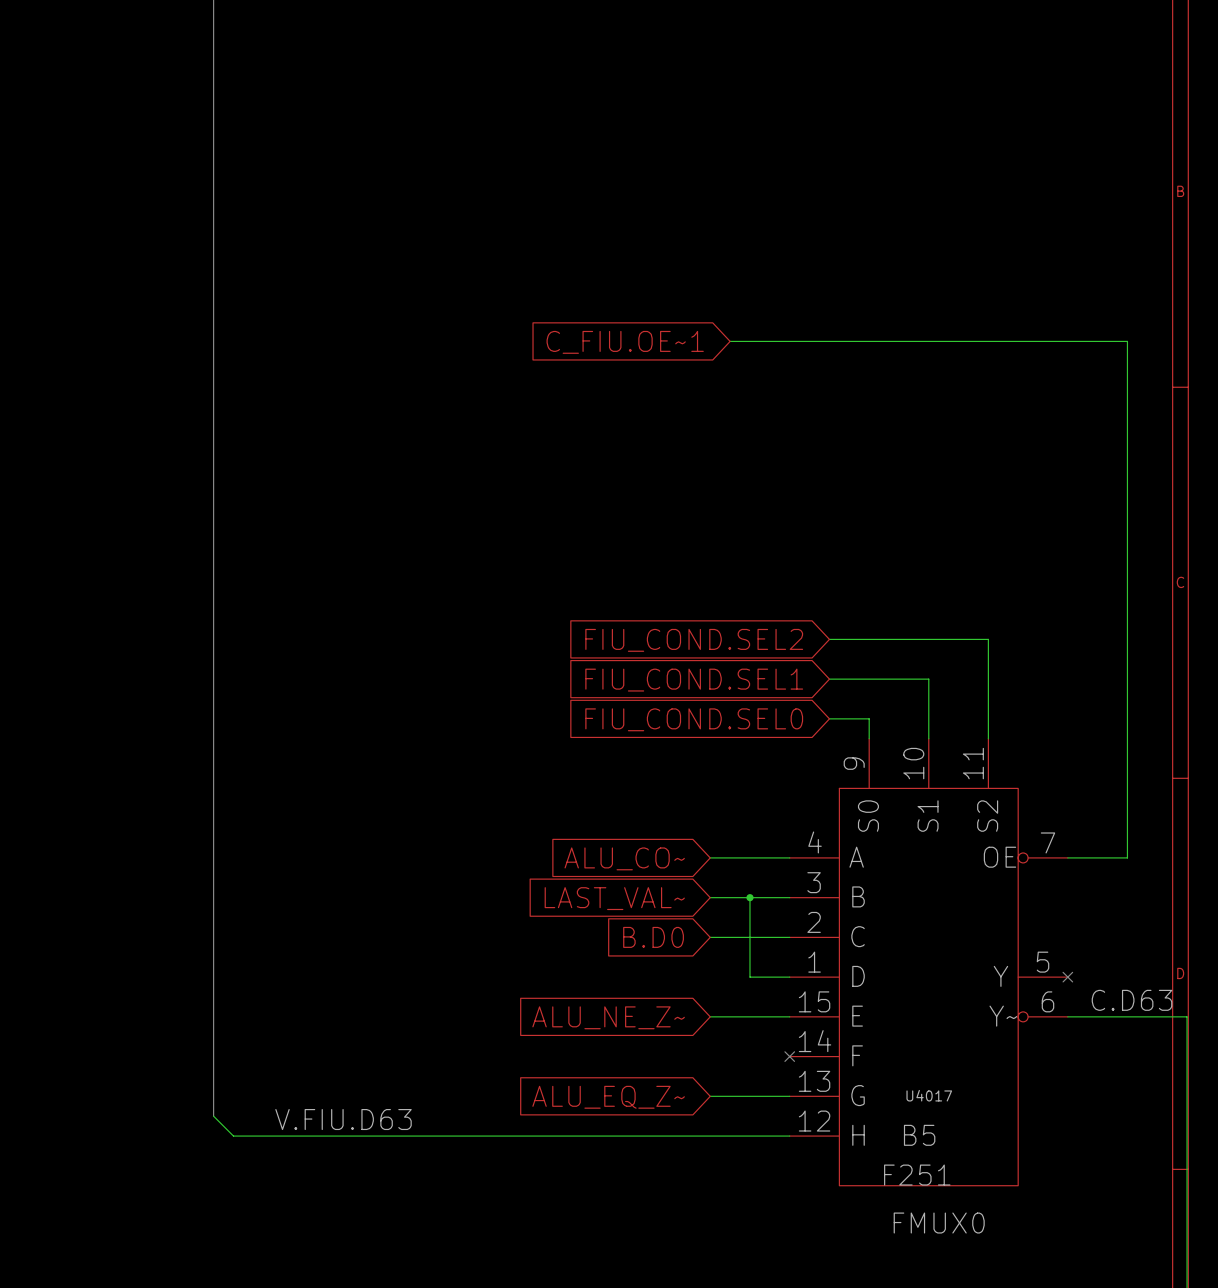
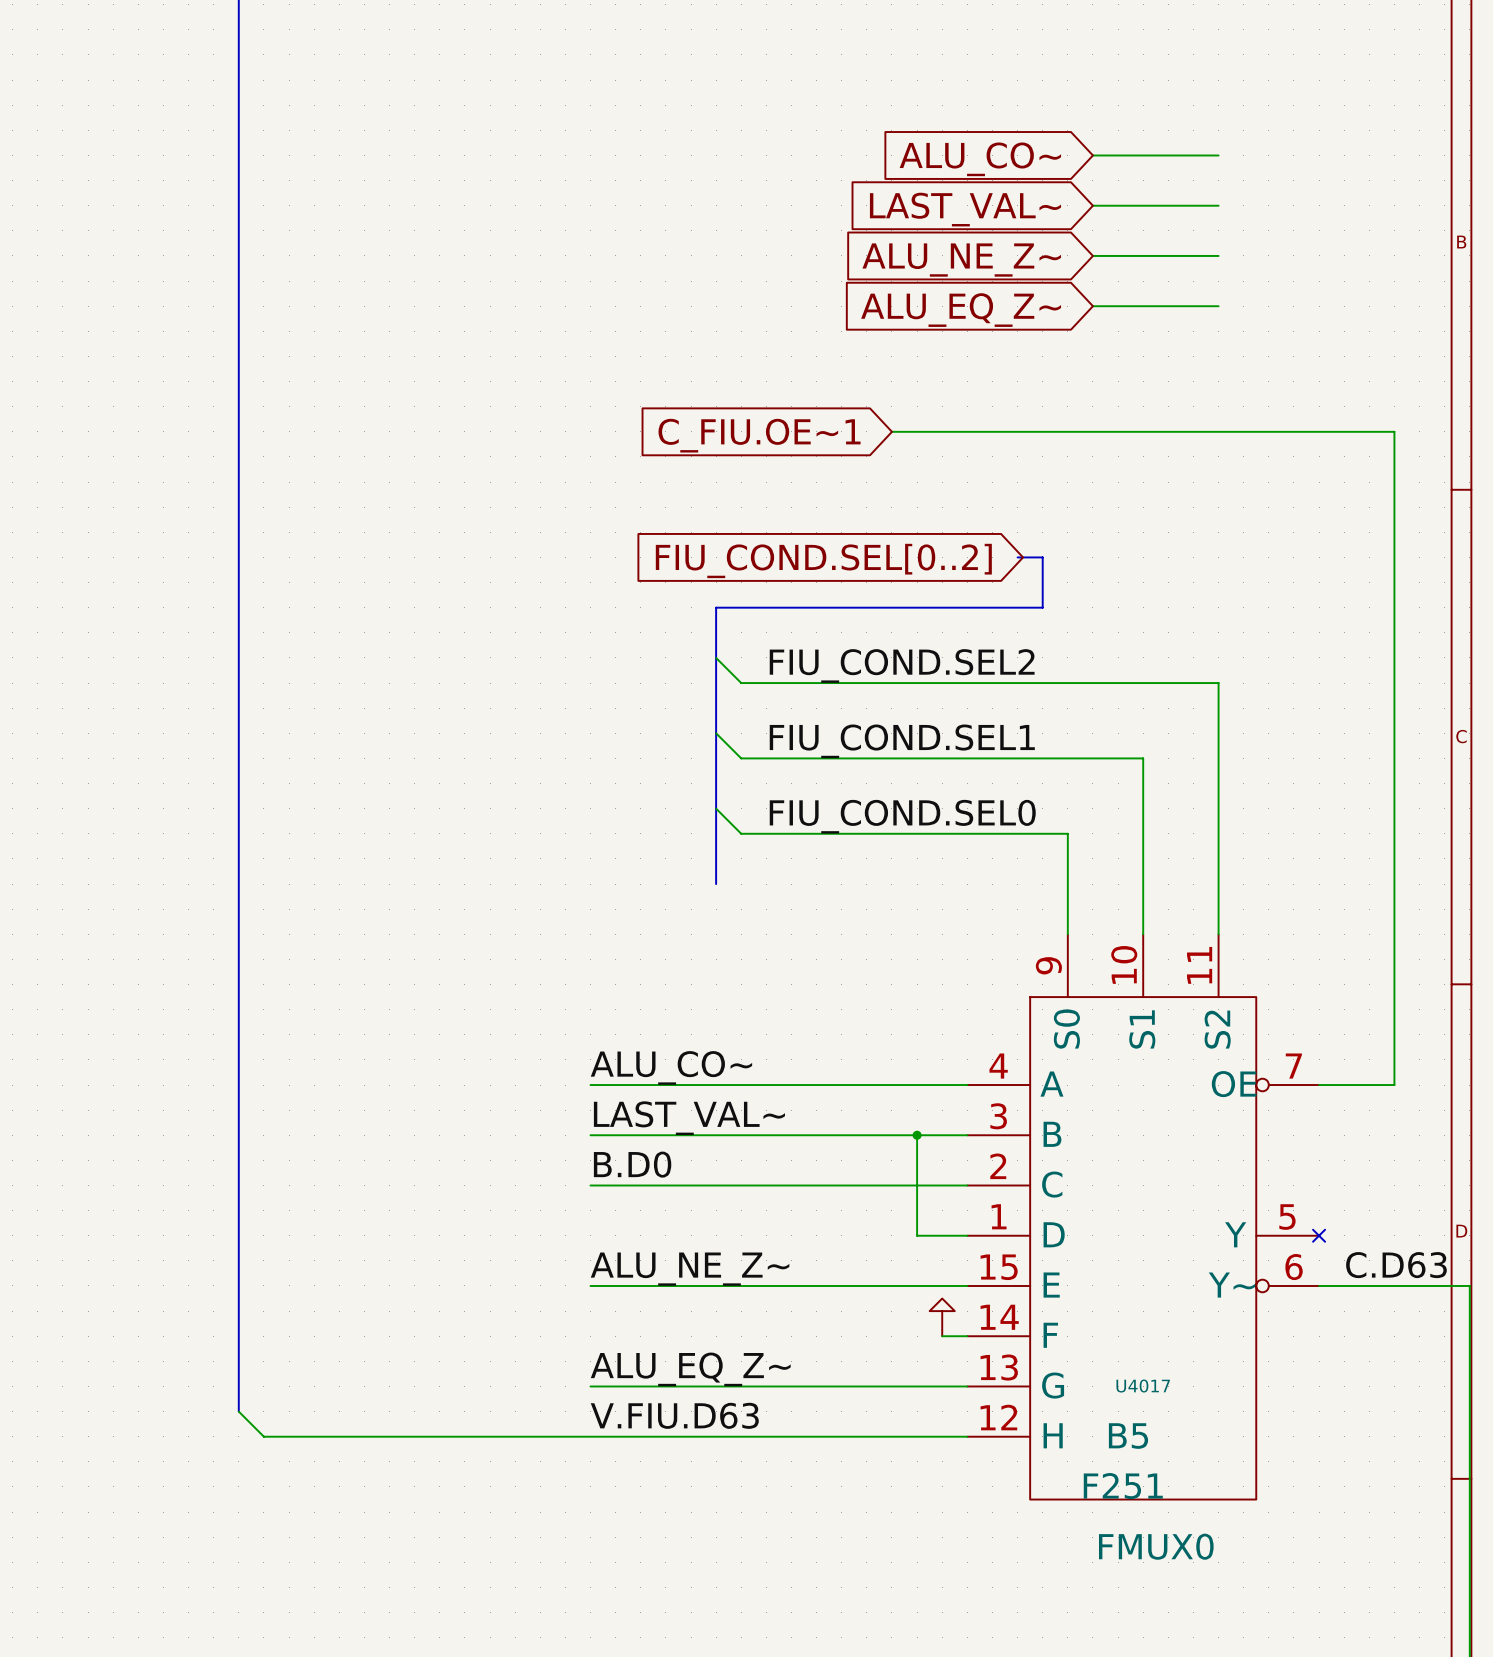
wire: none -> (1092, 155) (1218, 155)
global label: none -> ALU_CO~ (980, 159)
wire: none -> (1092, 205) (1218, 205)
global label: none -> LAST_VAL~ (965, 209)
wire: none -> (1092, 255) (1218, 255)
global label: none -> ALU_NE_Z~ (961, 260)
wire: none -> (1092, 306) (1218, 306)
global label: none -> ALU_EQ_Z~ (961, 310)
bus: none -> (1017, 557) (1042, 557) (1042, 607) (716, 607) (716, 884)
global label: none -> FIU_COND.SEL[0..2] (823, 560)
label: none -> FIU_COND.SEL2 (902, 665)
label: none -> FIU_COND.SEL1 (902, 741)
wire: (829, 639) (988, 639) -> (716, 657) (741, 683) (1218, 683) (1218, 808)
global label: FIU_COND.SEL2 (694, 640) -> none
label: none -> FIU_COND.SEL0 (902, 816)
wire: (829, 679) (928, 679) -> (716, 733) (741, 758) (1143, 758) (1143, 858)
global label: FIU_COND.SEL1 (694, 680) -> none
wire: (829, 718) (869, 718) -> (716, 808) (741, 833) (1067, 833) (1067, 909)
global label: FIU_COND.SEL0 (694, 719) -> none
label: none -> ALU_CO~ (671, 1067)
wire: none -> (590, 1085) (866, 1085)
global label: ALU_CO~ (624, 858) -> none
label: none -> LAST_VAL~ (689, 1118)
wire: none -> (590, 1135) (866, 1135)
global label: LAST_VAL~ (614, 898) -> none
label: none -> B.D0 (632, 1164)
wire: none -> (590, 1185) (866, 1185)
global label: B.D0 (653, 937) -> none
label: none -> ALU_NE_Z~ (690, 1269)
wire: none -> (590, 1285) (866, 1285)
global label: ALU_NE_Z~ (608, 1017) -> none
power symbol: none -> (942, 1317)
wire: none -> (942, 1336) (967, 1336)
no-connect mark: (789, 1056) -> none
label: none -> ALU_EQ_Z~ (690, 1369)
wire: none -> (590, 1386) (866, 1386)
global label: ALU_EQ_Z~ (608, 1097) -> none
label: V.FIU.D63 (343, 1119) -> none
label: none -> V.FIU.D63 (674, 1415)

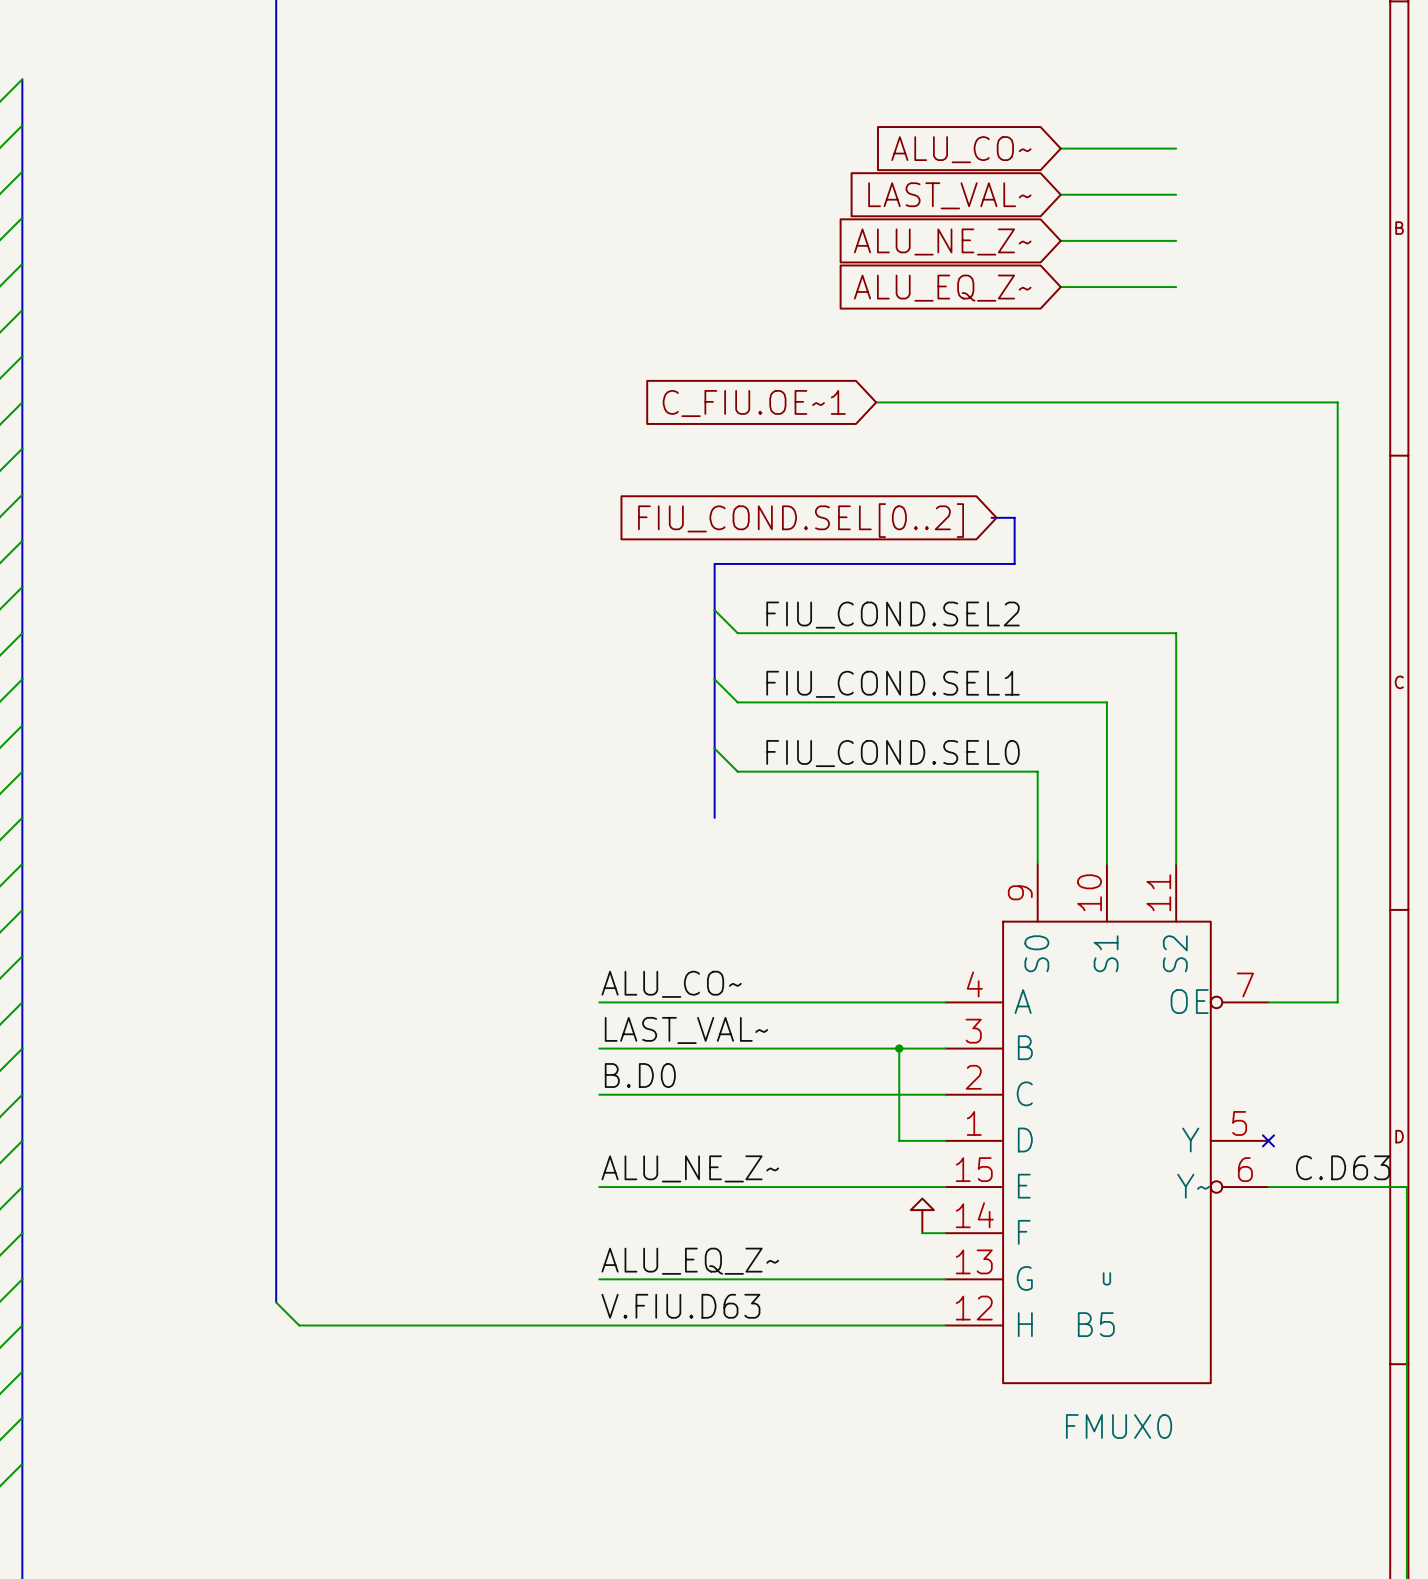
U4017 name: U4017 (1143, 1386) -> U (1106, 1278)
U4017 value: F251 (1123, 1486) -> none

